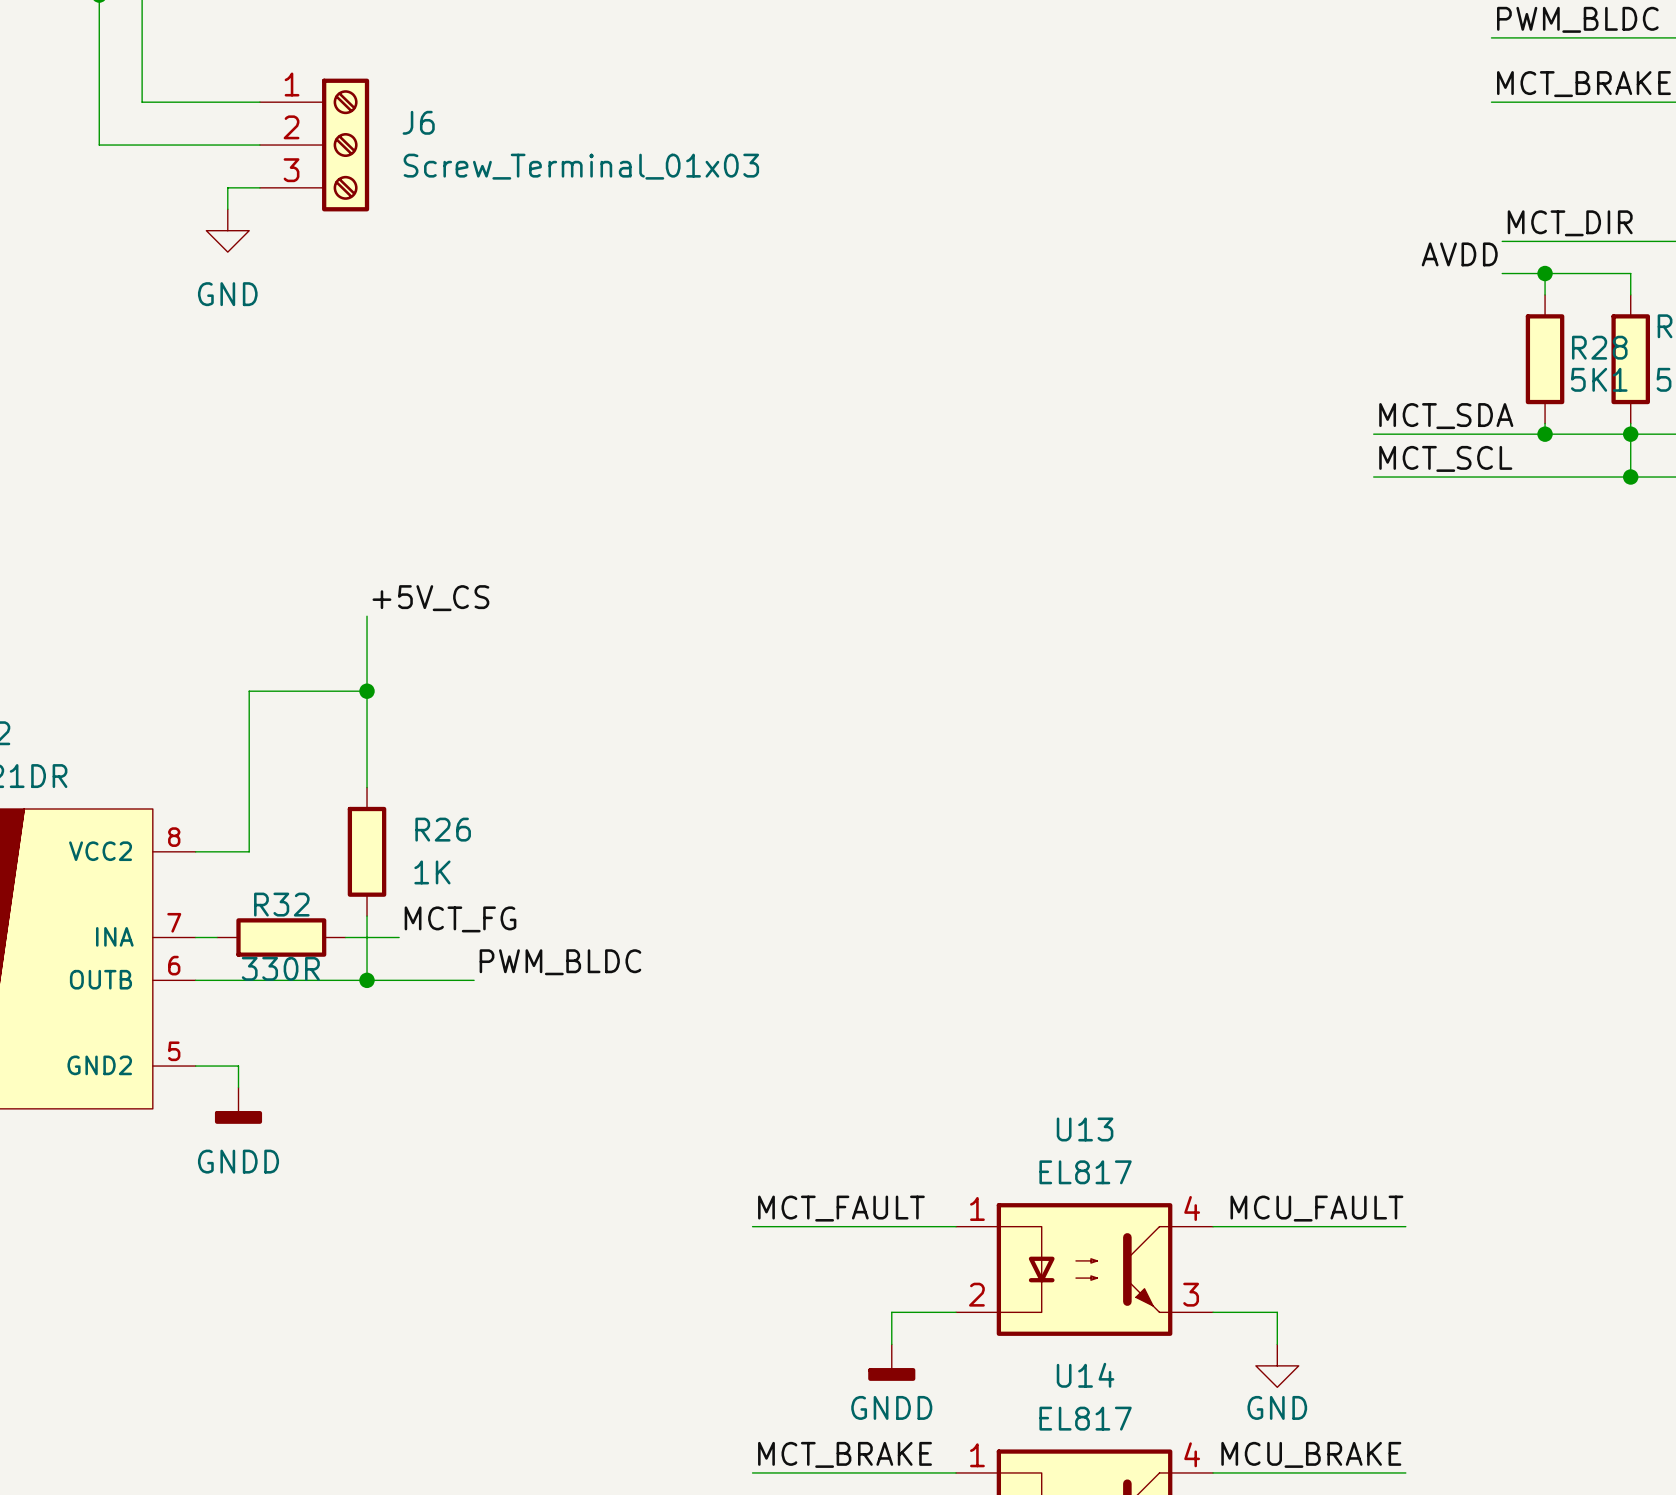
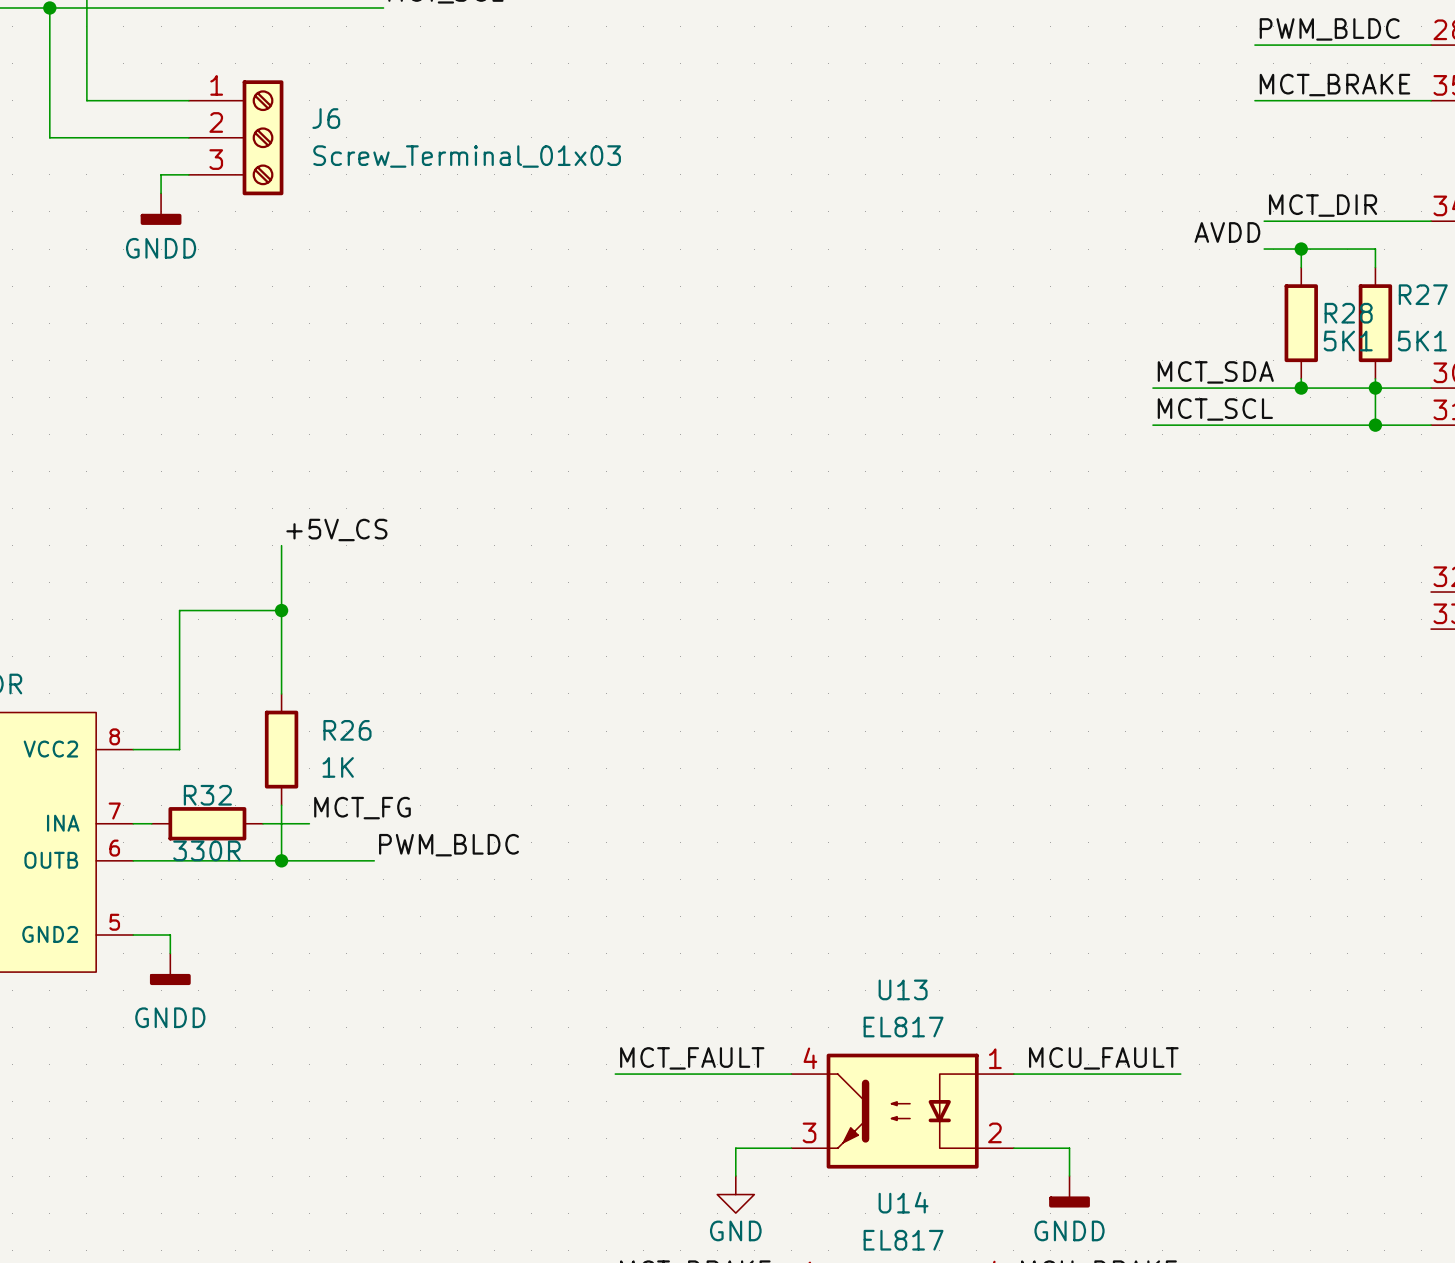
power symbol: GND (227, 230) -> GNDD (161, 209)
U13 flip: as is (1084, 1269) -> left-right (902, 1111)
power symbol: GNDD (891, 1362) -> GND (735, 1194)
power symbol: GND (1277, 1365) -> GNDD (1069, 1191)

